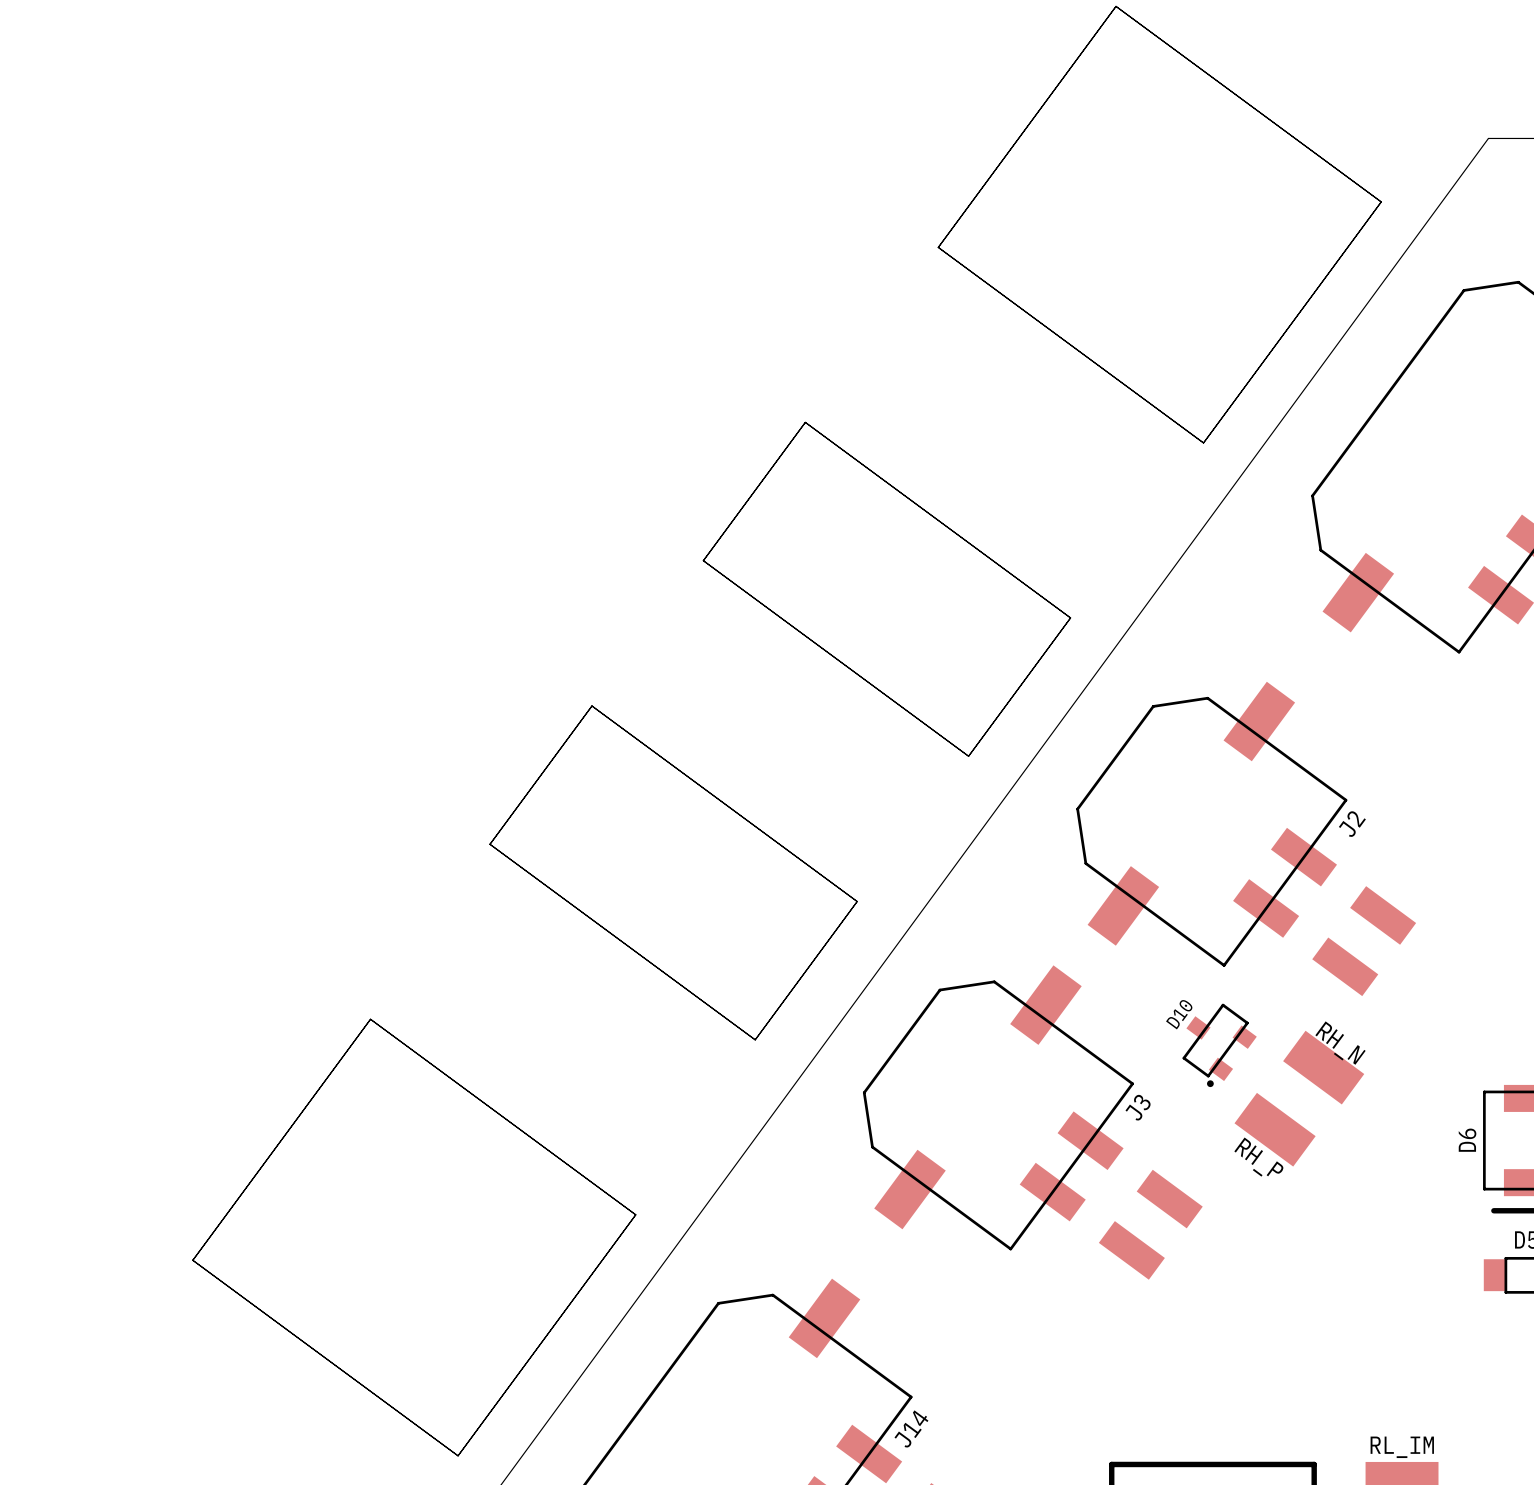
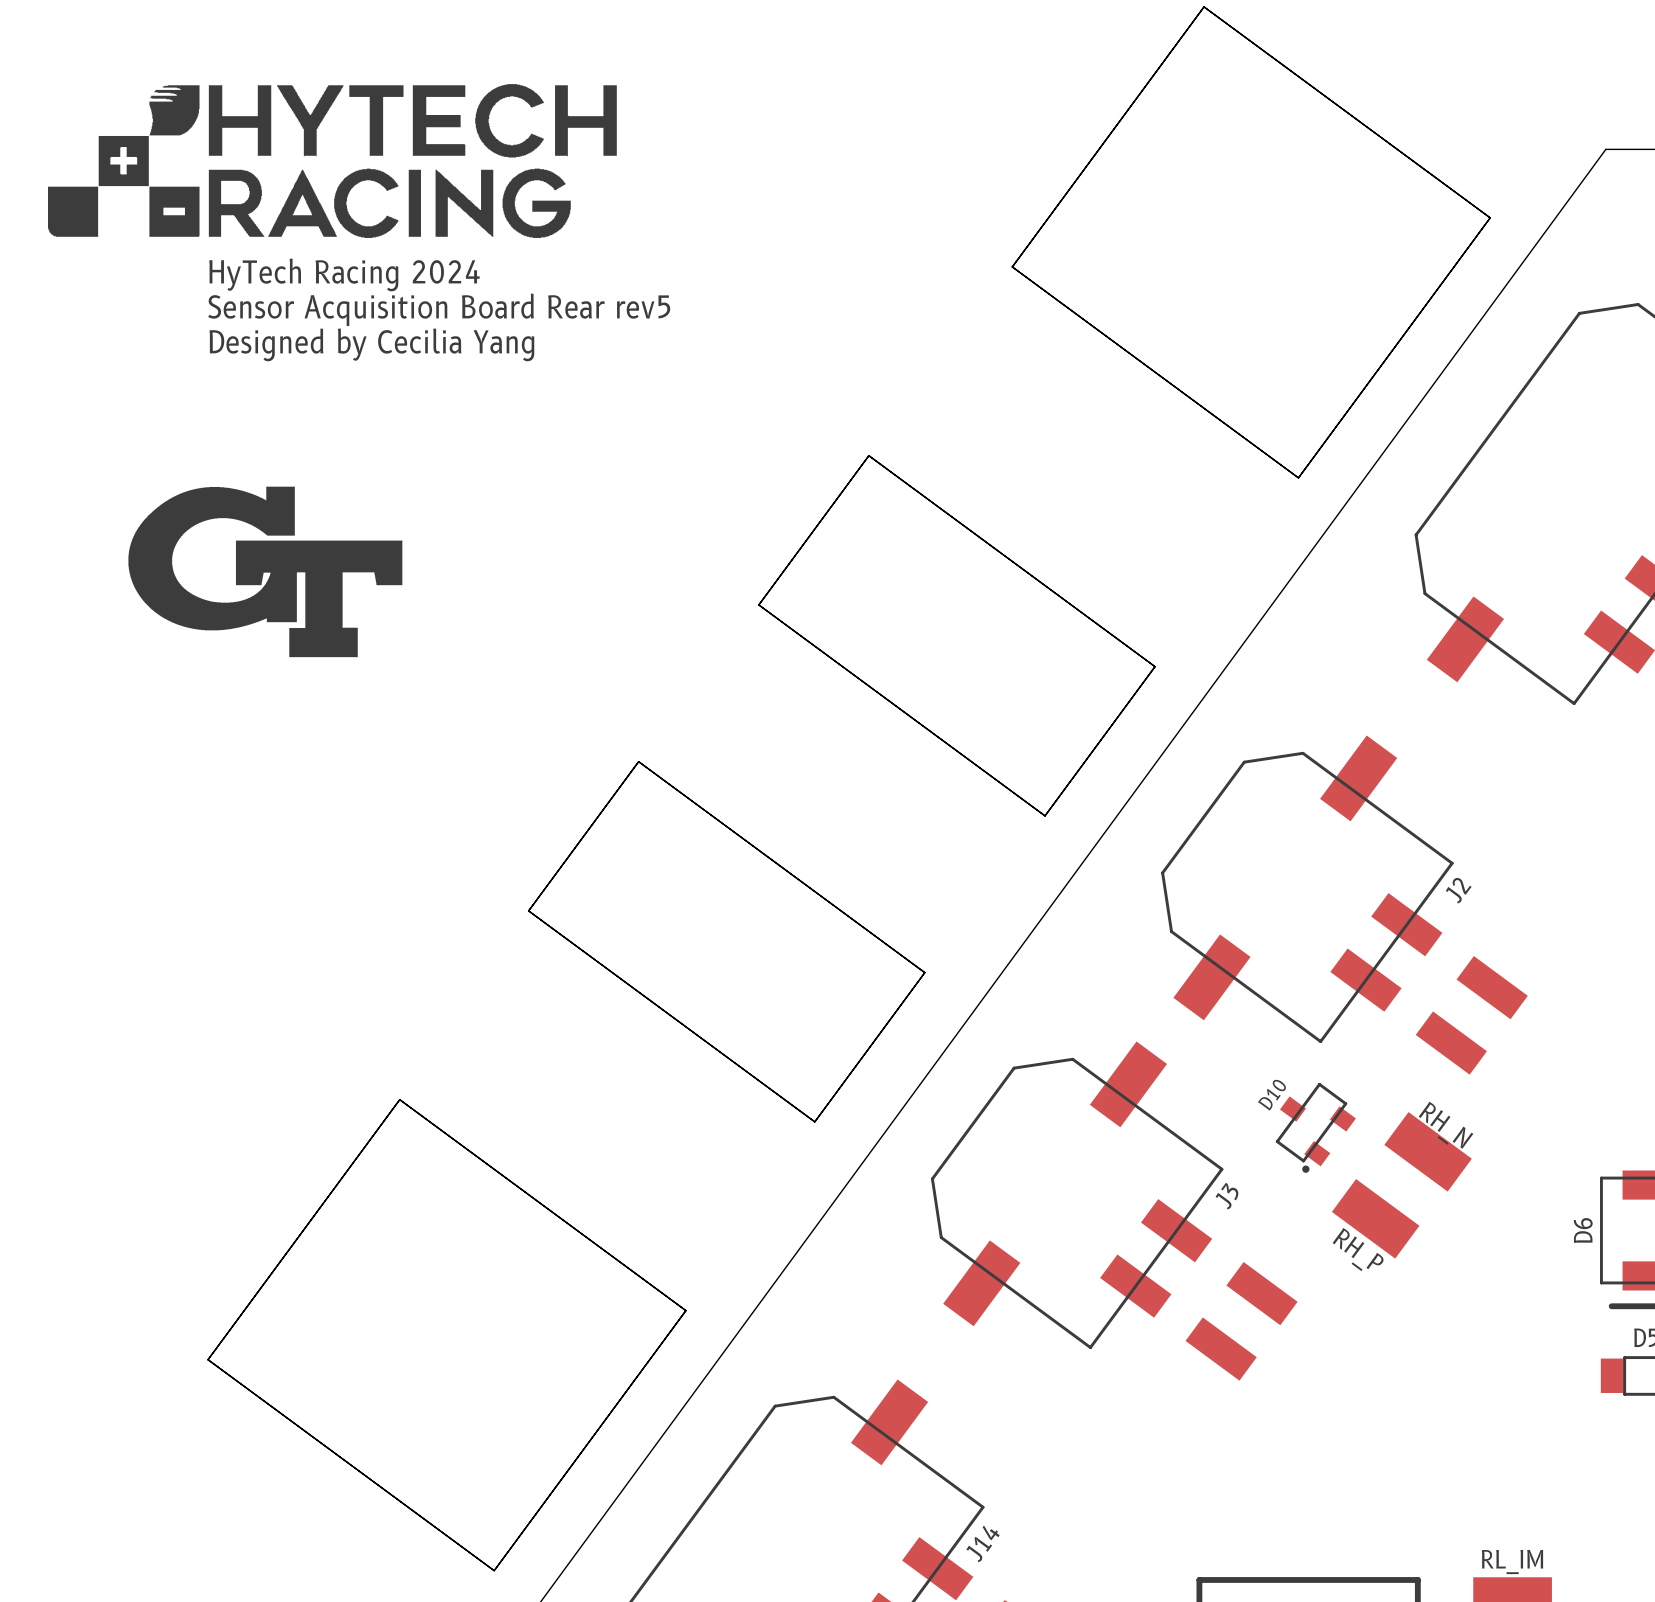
drawing: none -> [48, 84, 617, 238]
text: none -> HyTech Racing 2024 (344, 274)
text: none -> Sensor Acquisition Board Rear rev5 (439, 309)
text: none -> Designed by Cecilia Yang (371, 344)
drawing: none -> [128, 486, 403, 658]

